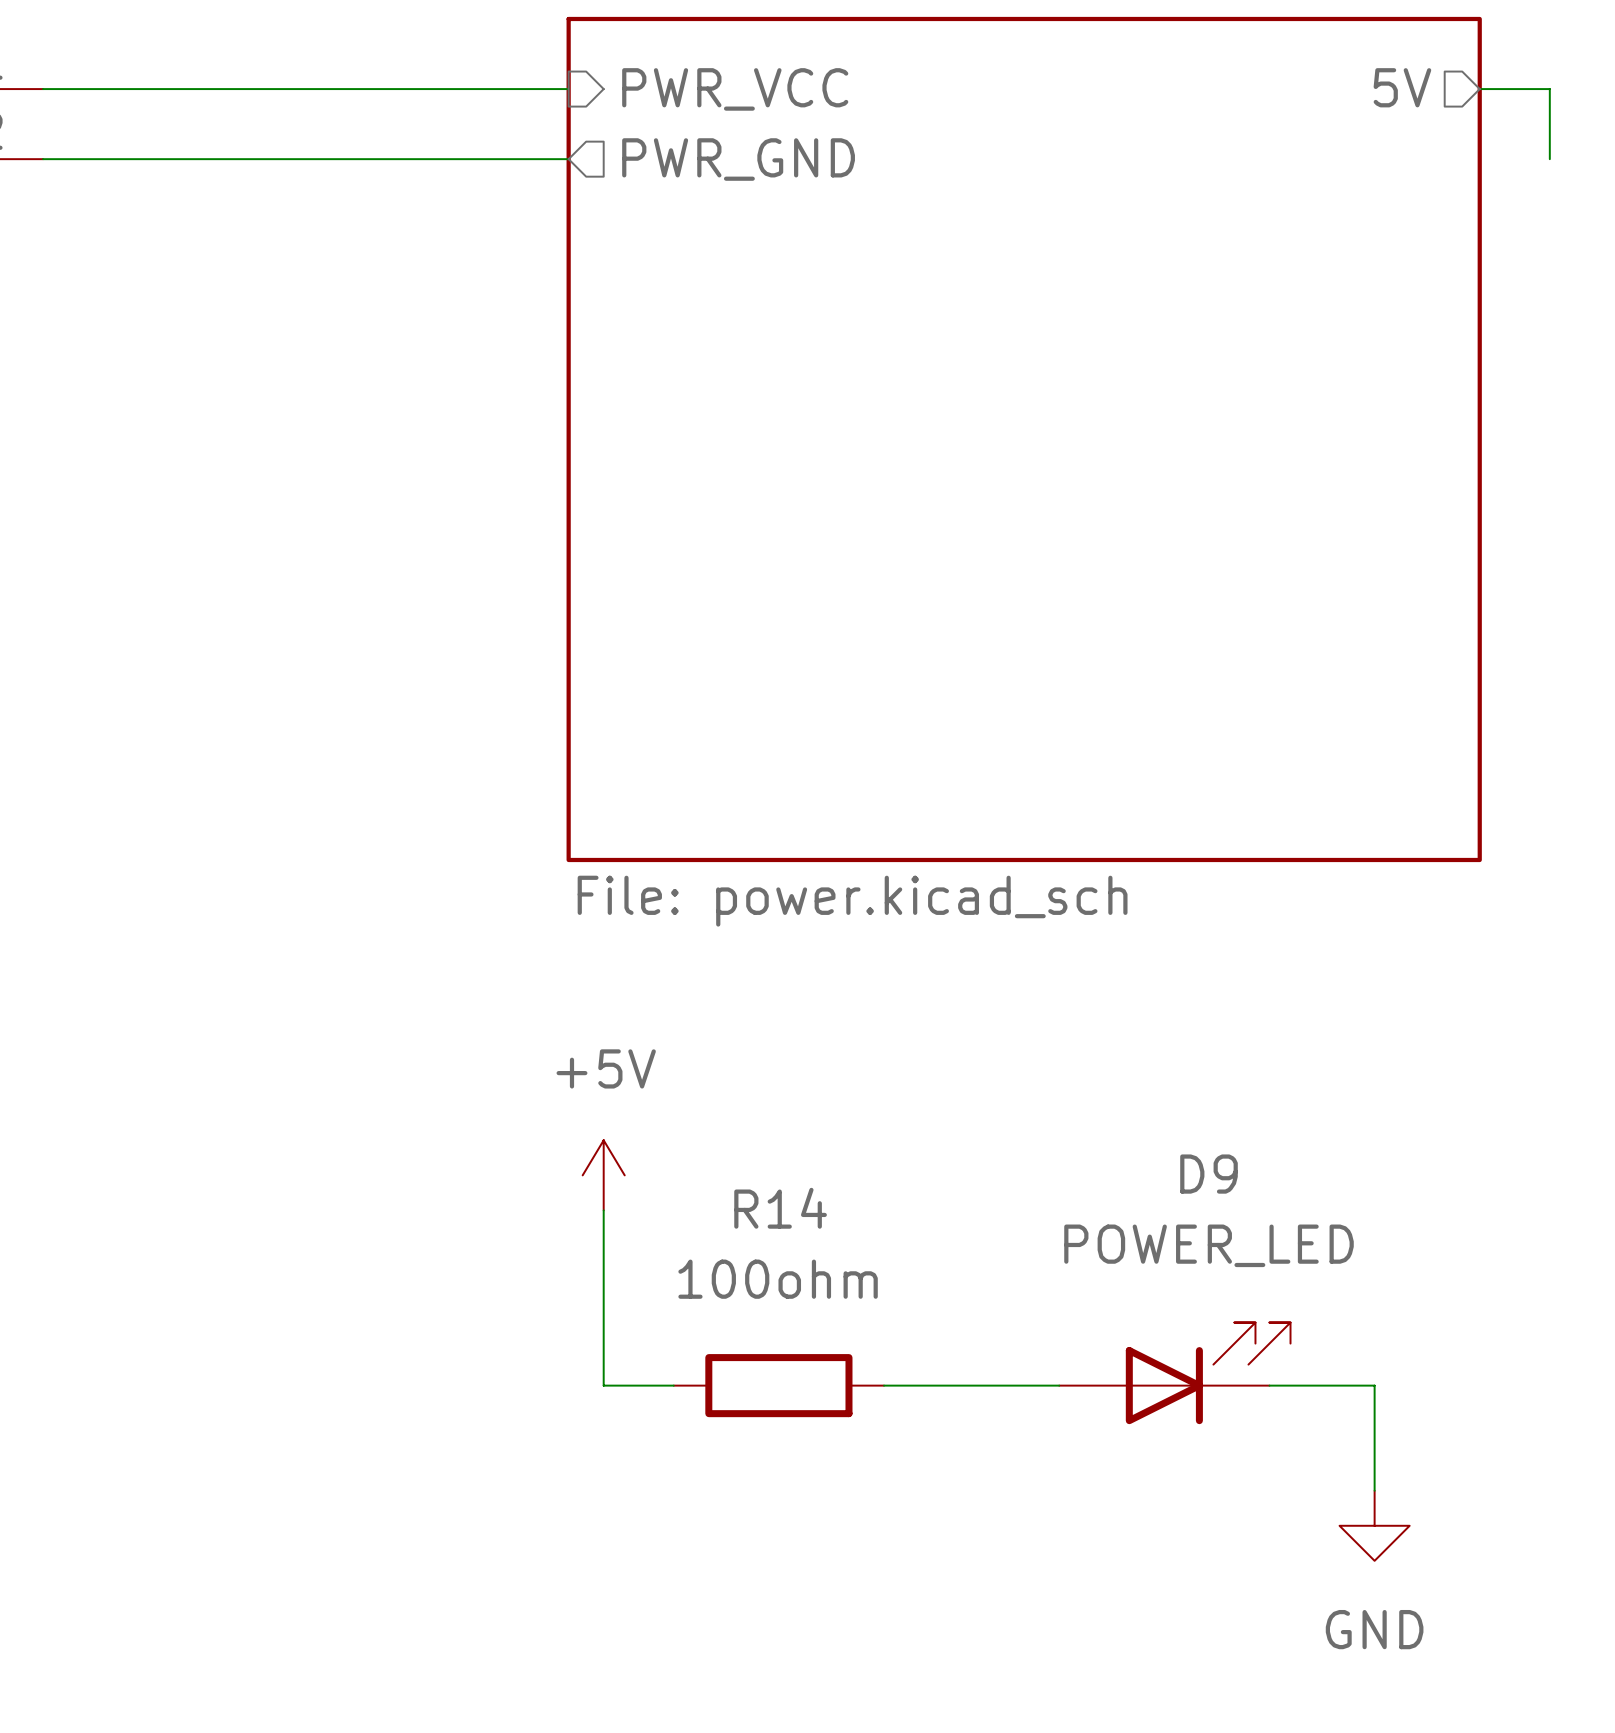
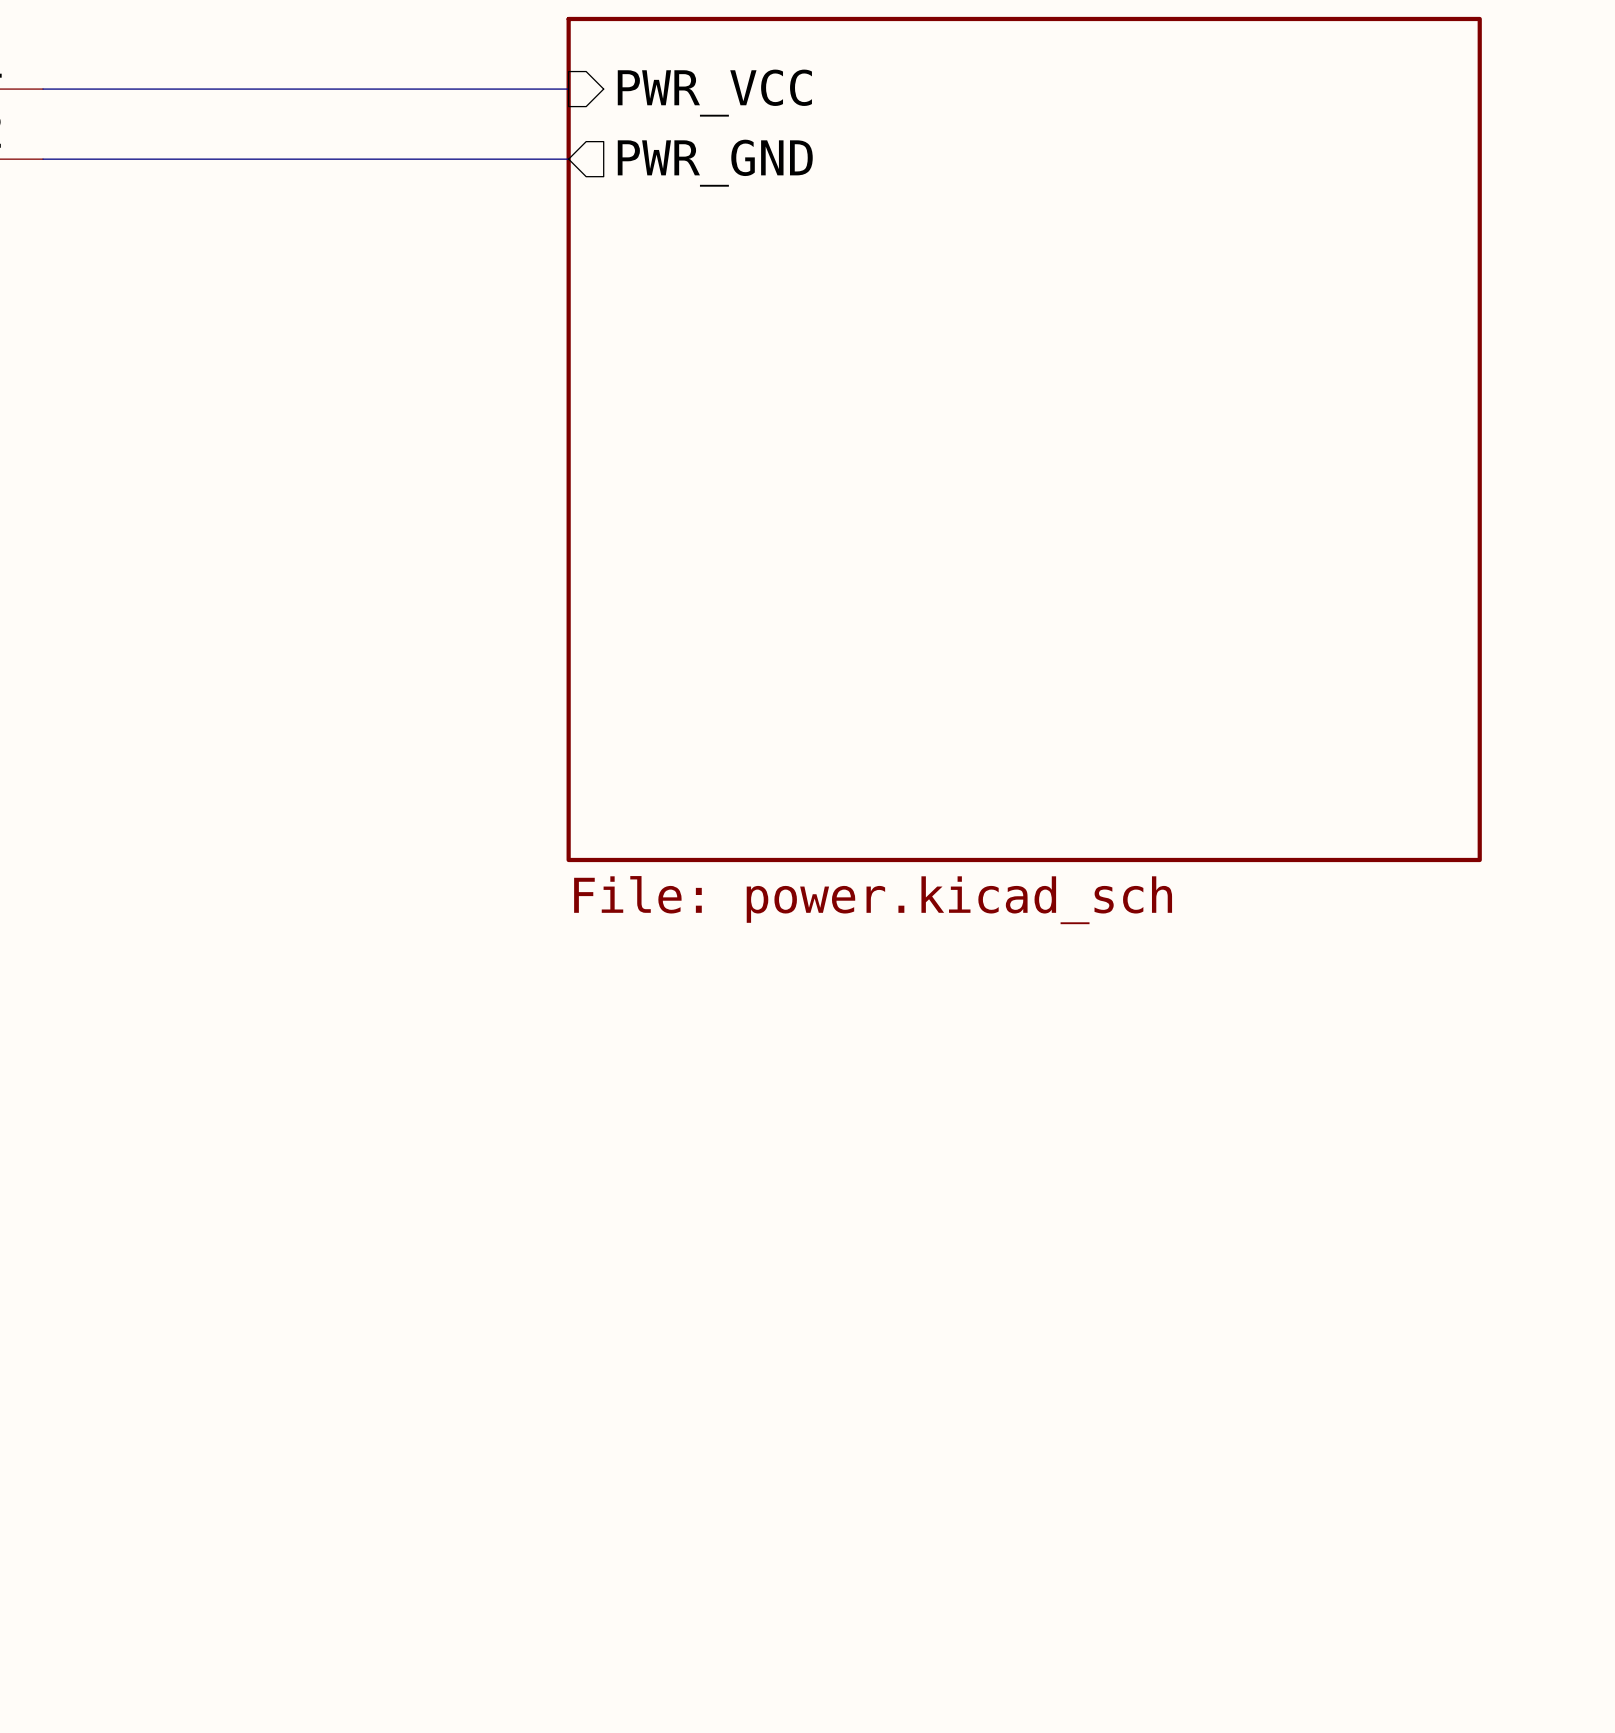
sheet pin: 5V (1402, 87) -> none
wire: (1479, 89) (1549, 89) (1549, 159) -> none
power symbol: +5V (603, 1175) -> none
wire: (603, 1210) (603, 1385) (673, 1385) -> none
D9: POWER_LED (1174, 1373) -> none
R14: 100ohm (778, 1385) -> none
wire: (884, 1385) (1059, 1385) -> none
wire: (1269, 1385) (1374, 1385) (1374, 1490) -> none
power symbol: GND (1374, 1525) -> none

